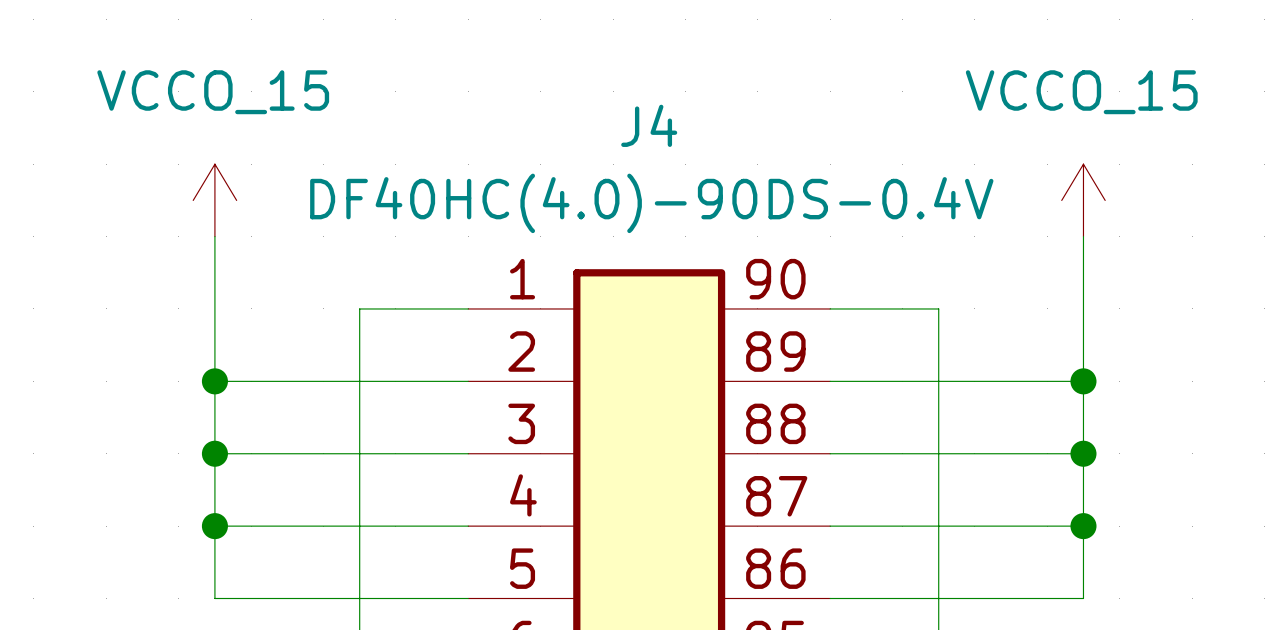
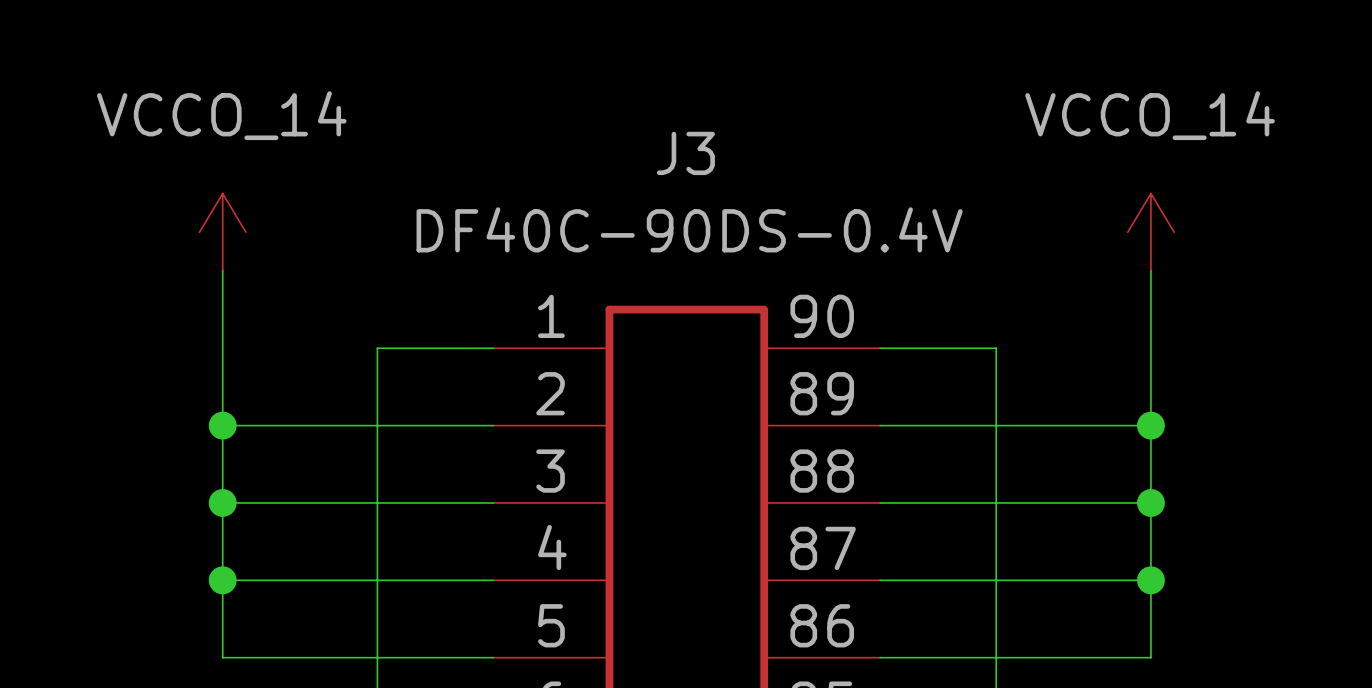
J4 name: J4 (649, 125) -> J3 (685, 153)
power symbol: VCCO_15 (214, 200) -> VCCO_14 (222, 232)
power symbol: VCCO_15 (1083, 200) -> VCCO_14 (1150, 232)
J4 value: DF40HC(4.0)-90DS-0.4V (651, 203) -> DF40C-90DS-0.4V (689, 229)

